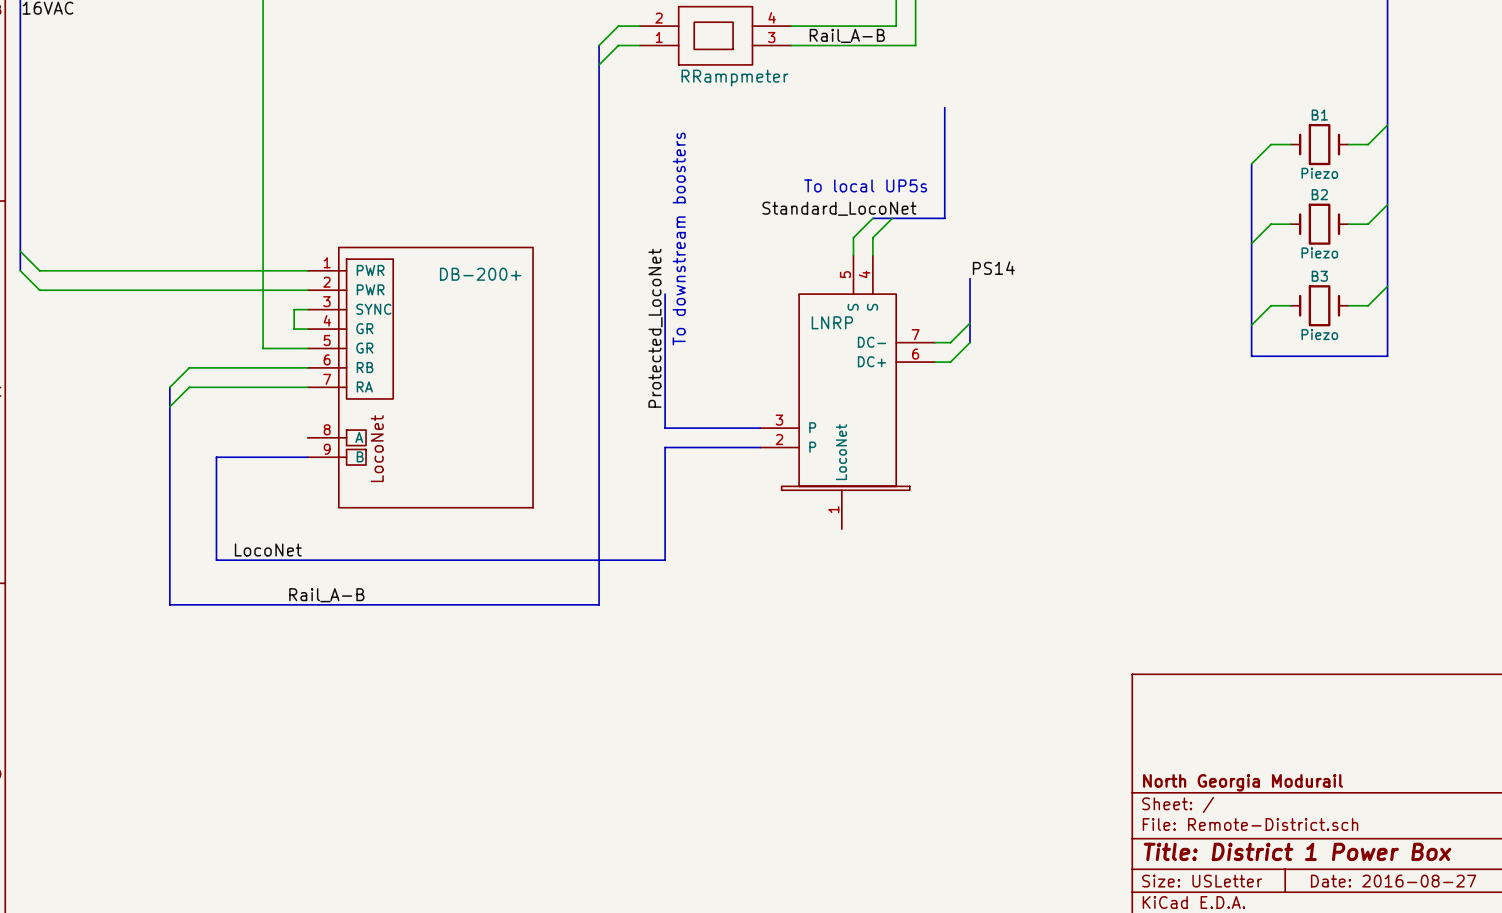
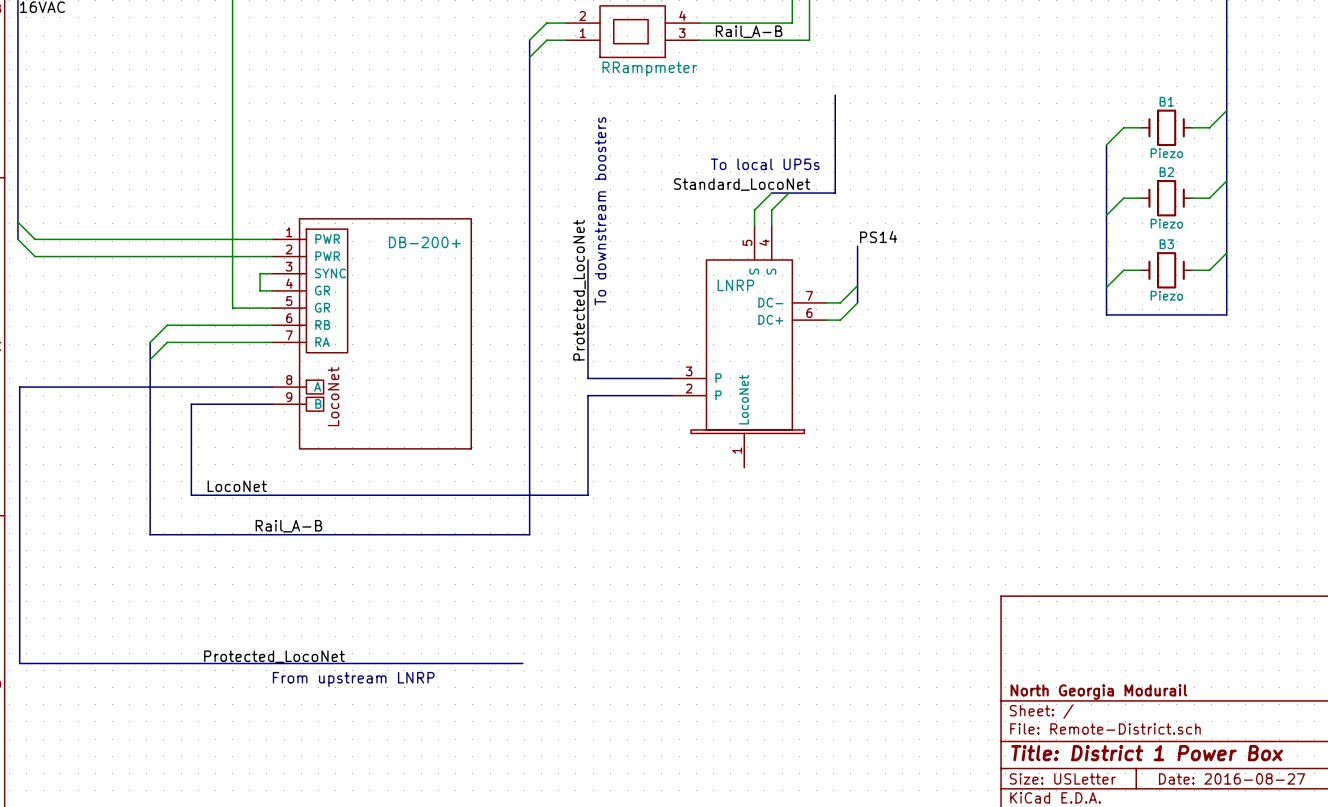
bus: none -> (272, 387) (19, 387) (19, 663) (522, 663)
label: none -> Protected_LocoNet (274, 656)
text: none -> From upstream LNRP (353, 679)

